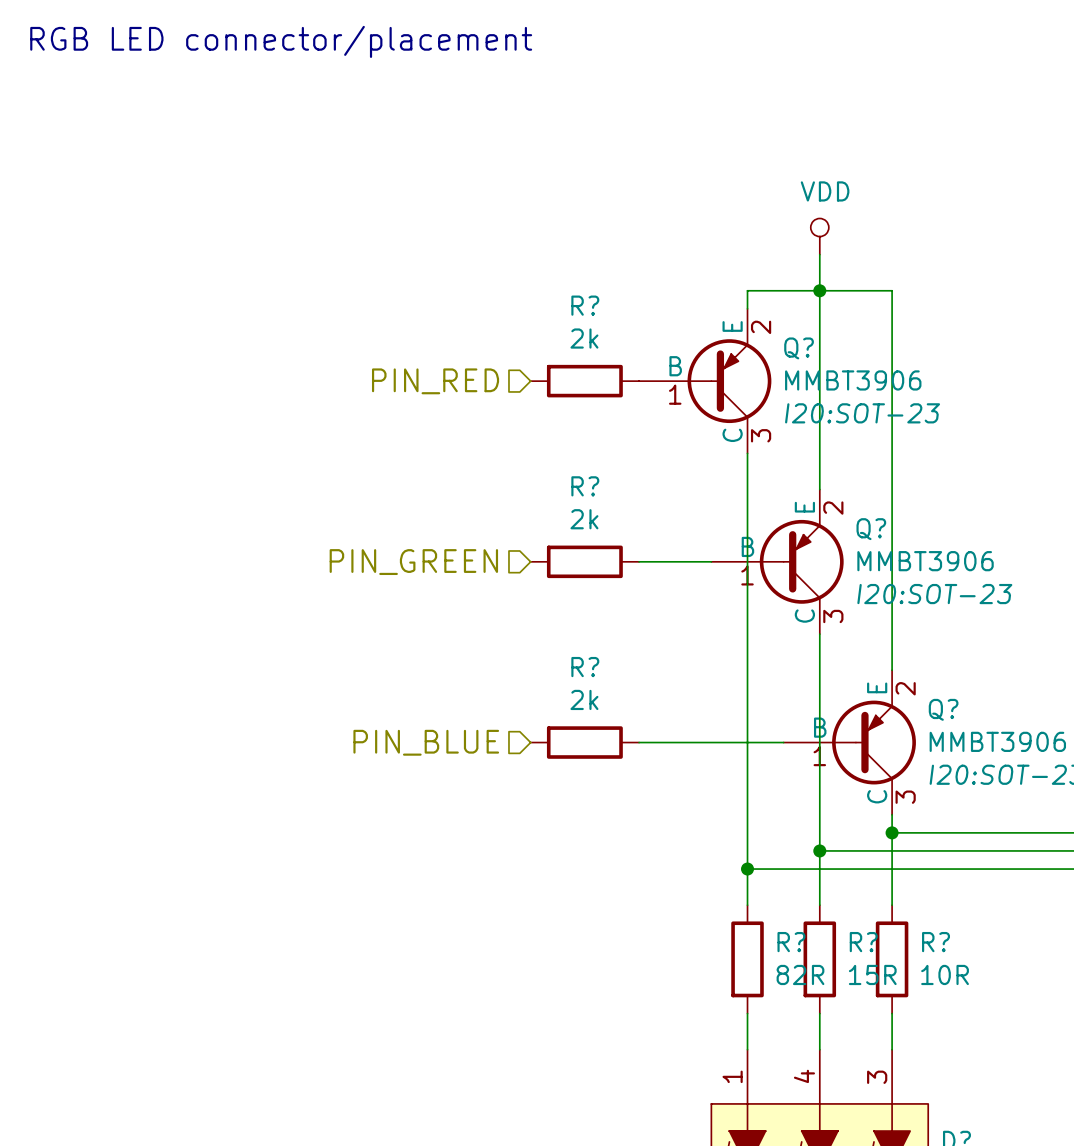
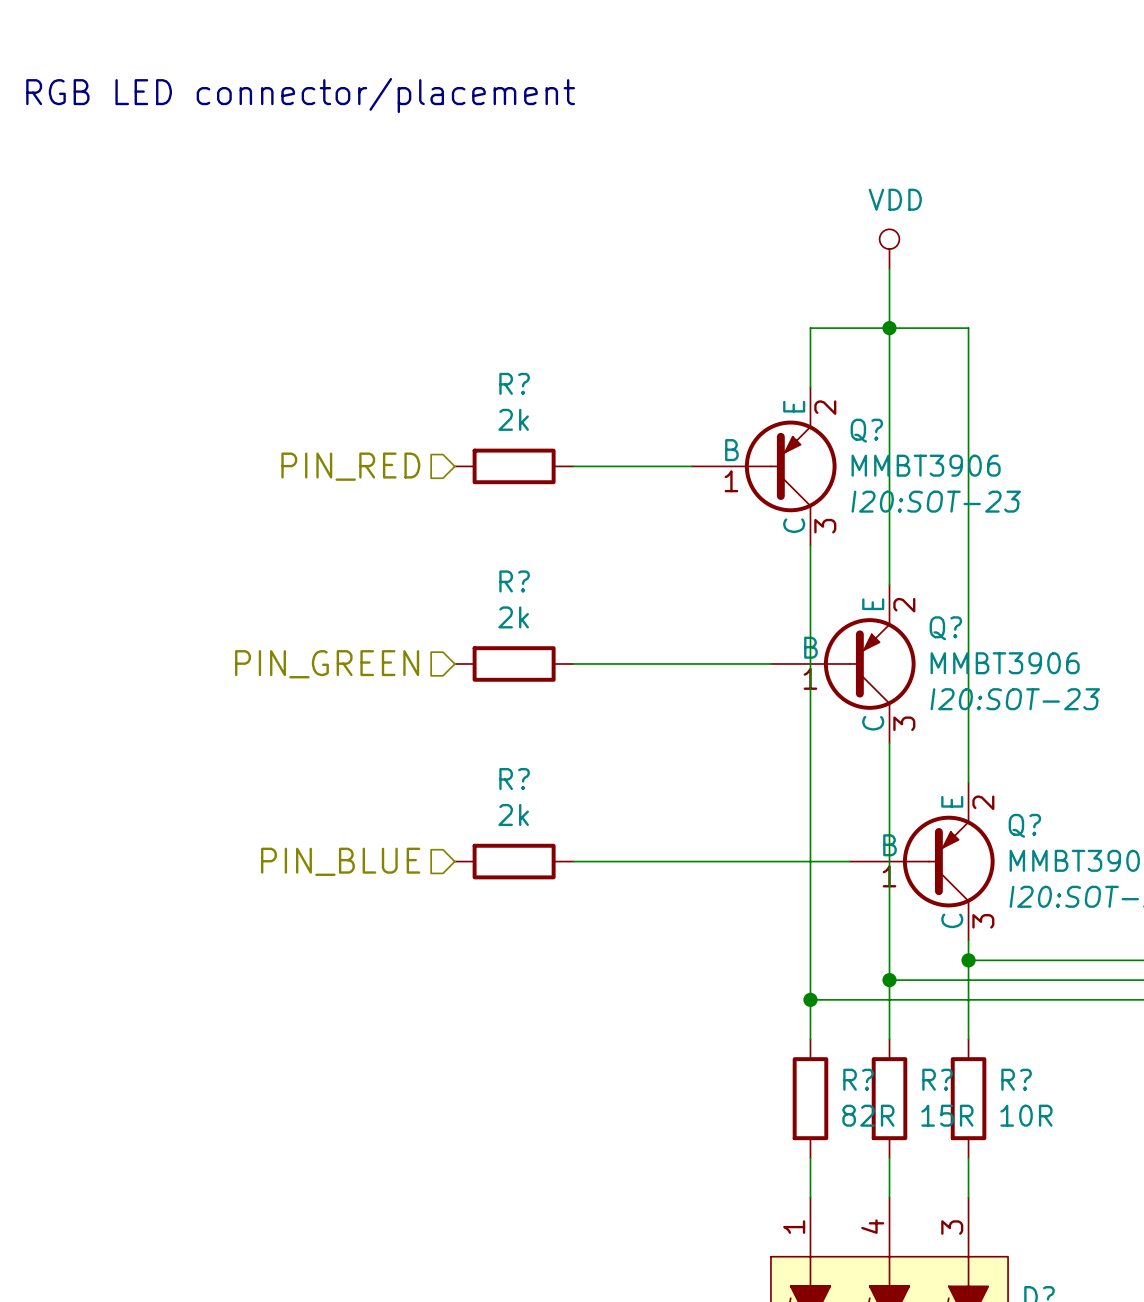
wire: none -> (889, 268) (889, 328)
power symbol position: VDD (819, 236) -> VDD (889, 249)
wire: (747, 290) (892, 290) -> (810, 367) (810, 328) (968, 328) (968, 367)
junction position: (819, 290) -> (889, 328)
hierarchical label position: PIN_RED (435, 381) -> PIN_RED (350, 466)
R?: none -> 2k (514, 466)
wire: none -> (573, 466) (691, 466)
R?: 2k (584, 381) -> none
R?: none -> 2k (514, 663)
wire: none -> (573, 663) (691, 663)
R?: 2k (584, 561) -> none
hierarchical label position: PIN_GREEN (413, 562) -> PIN_GREEN (327, 664)
hierarchical label position: PIN_BLUE (426, 742) -> PIN_BLUE (340, 861)
R?: none -> 2k (514, 861)
wire: none -> (573, 861) (691, 861)
R?: 2k (584, 742) -> none

